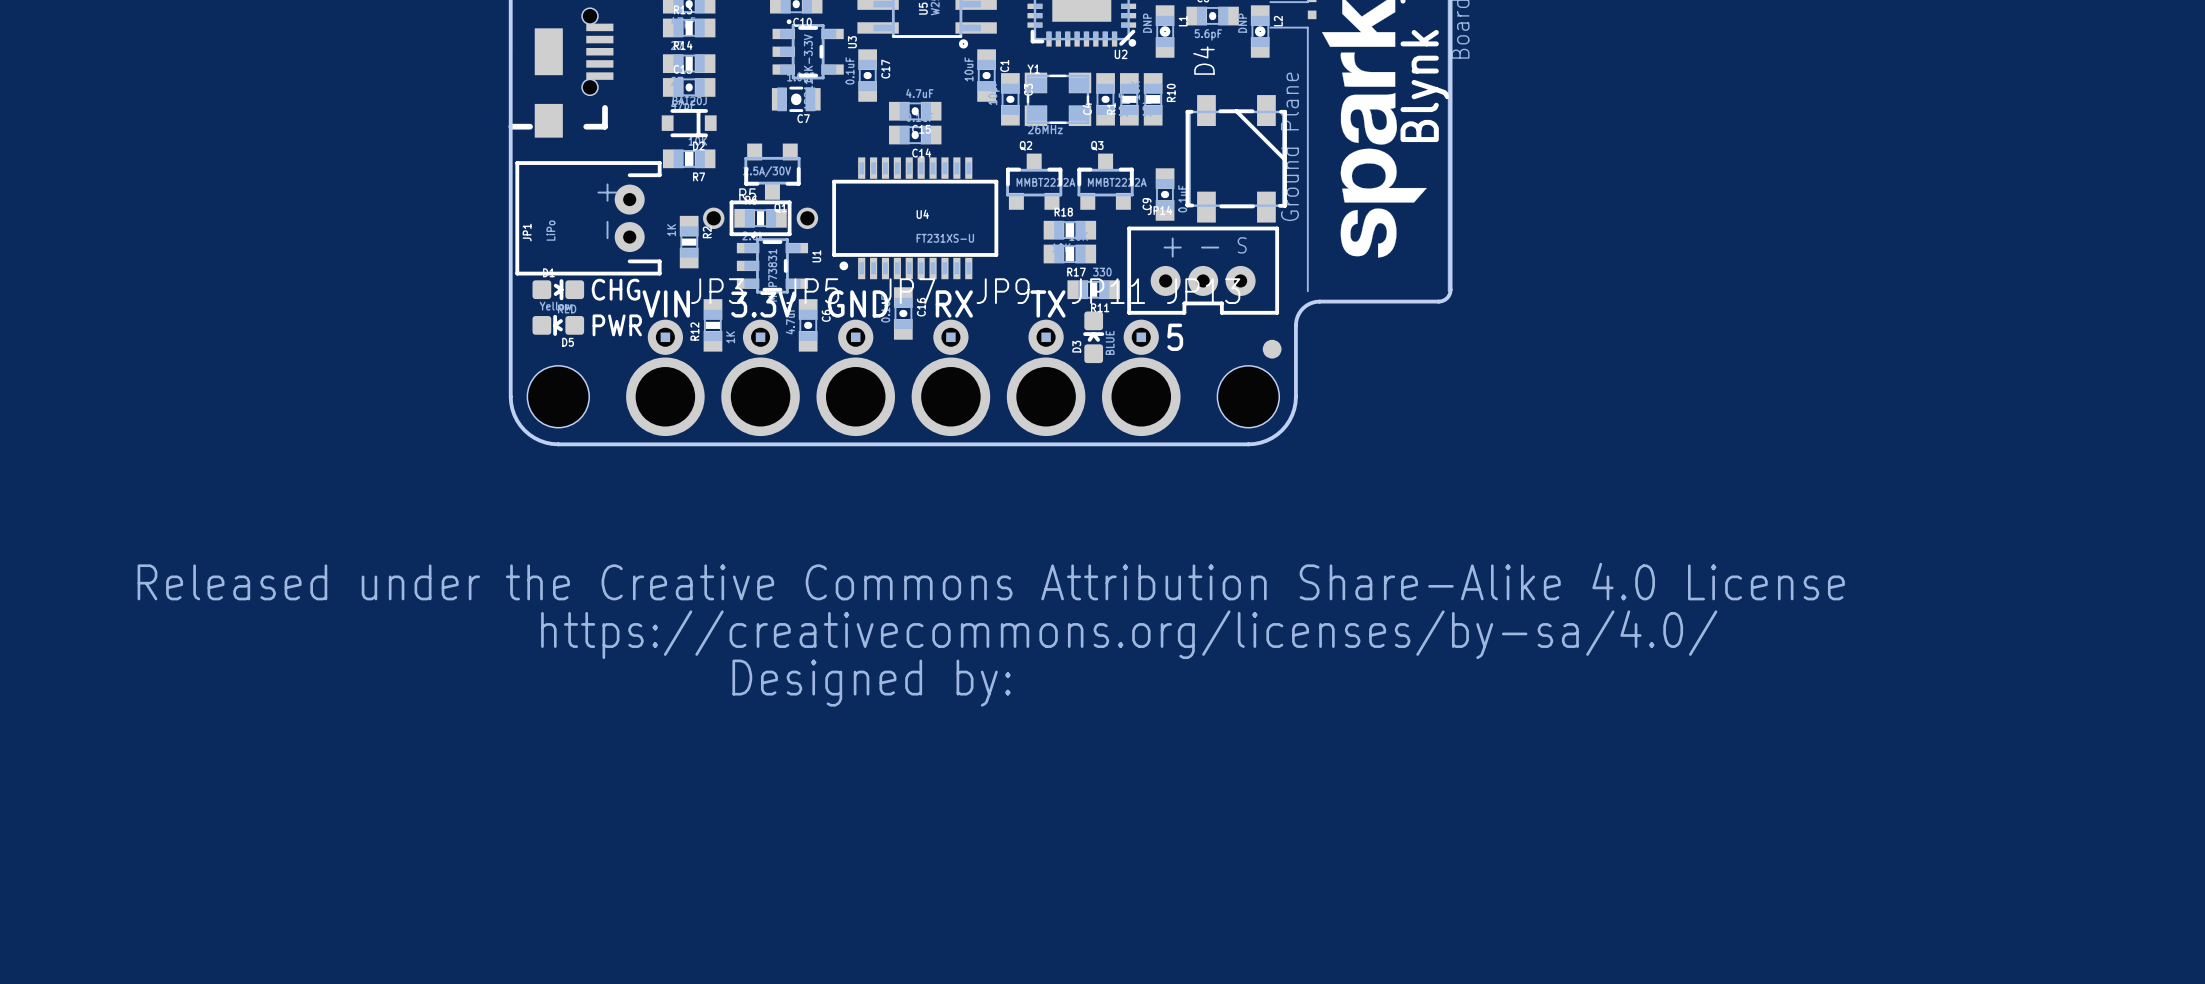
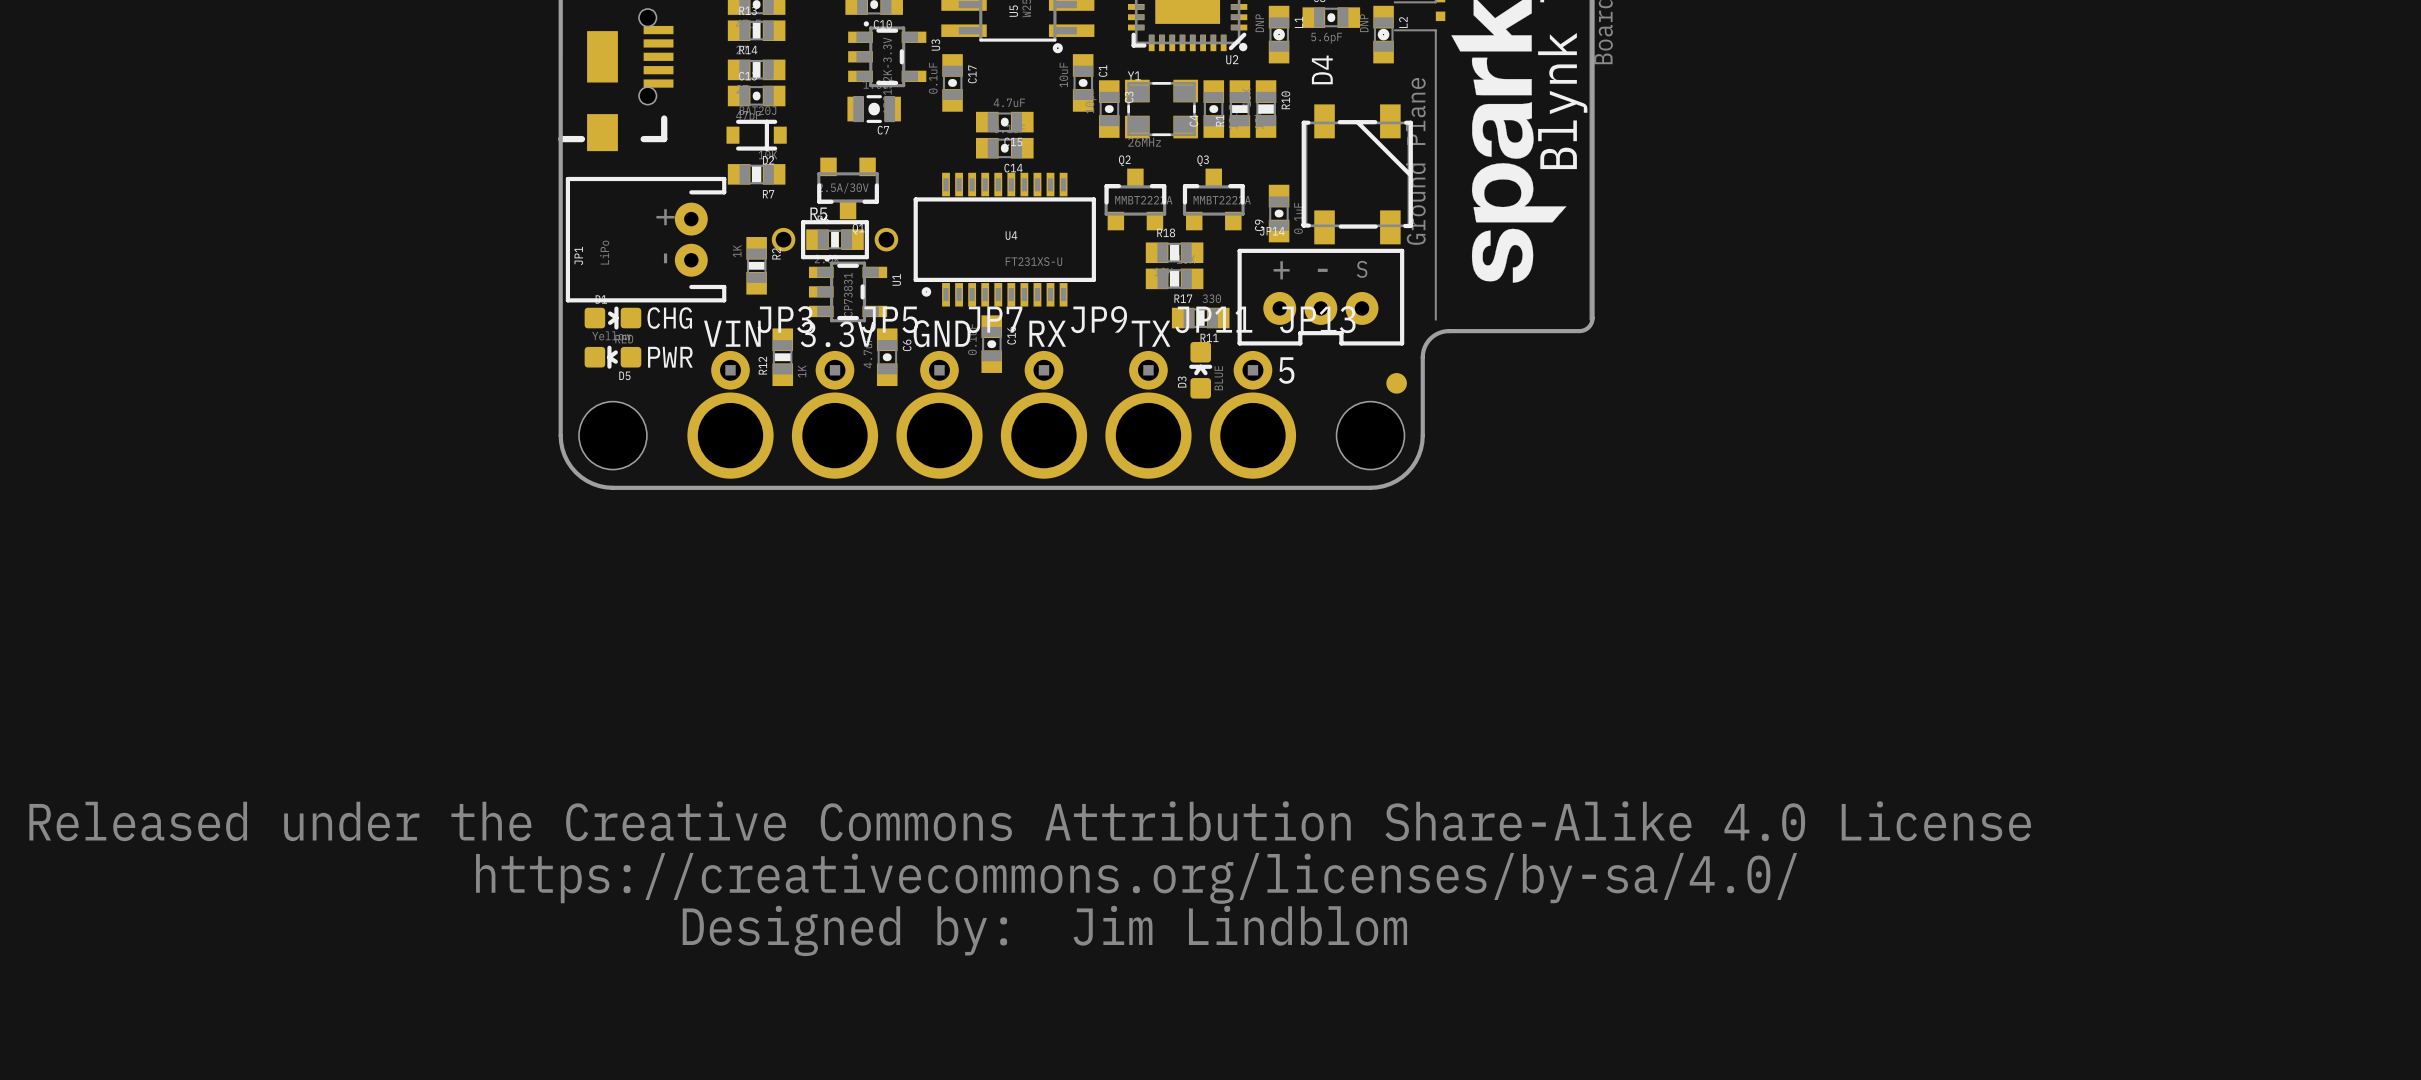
drawing position: (991, 634) -> (1030, 878)
text: none -> Jim Lindblom (1240, 925)

